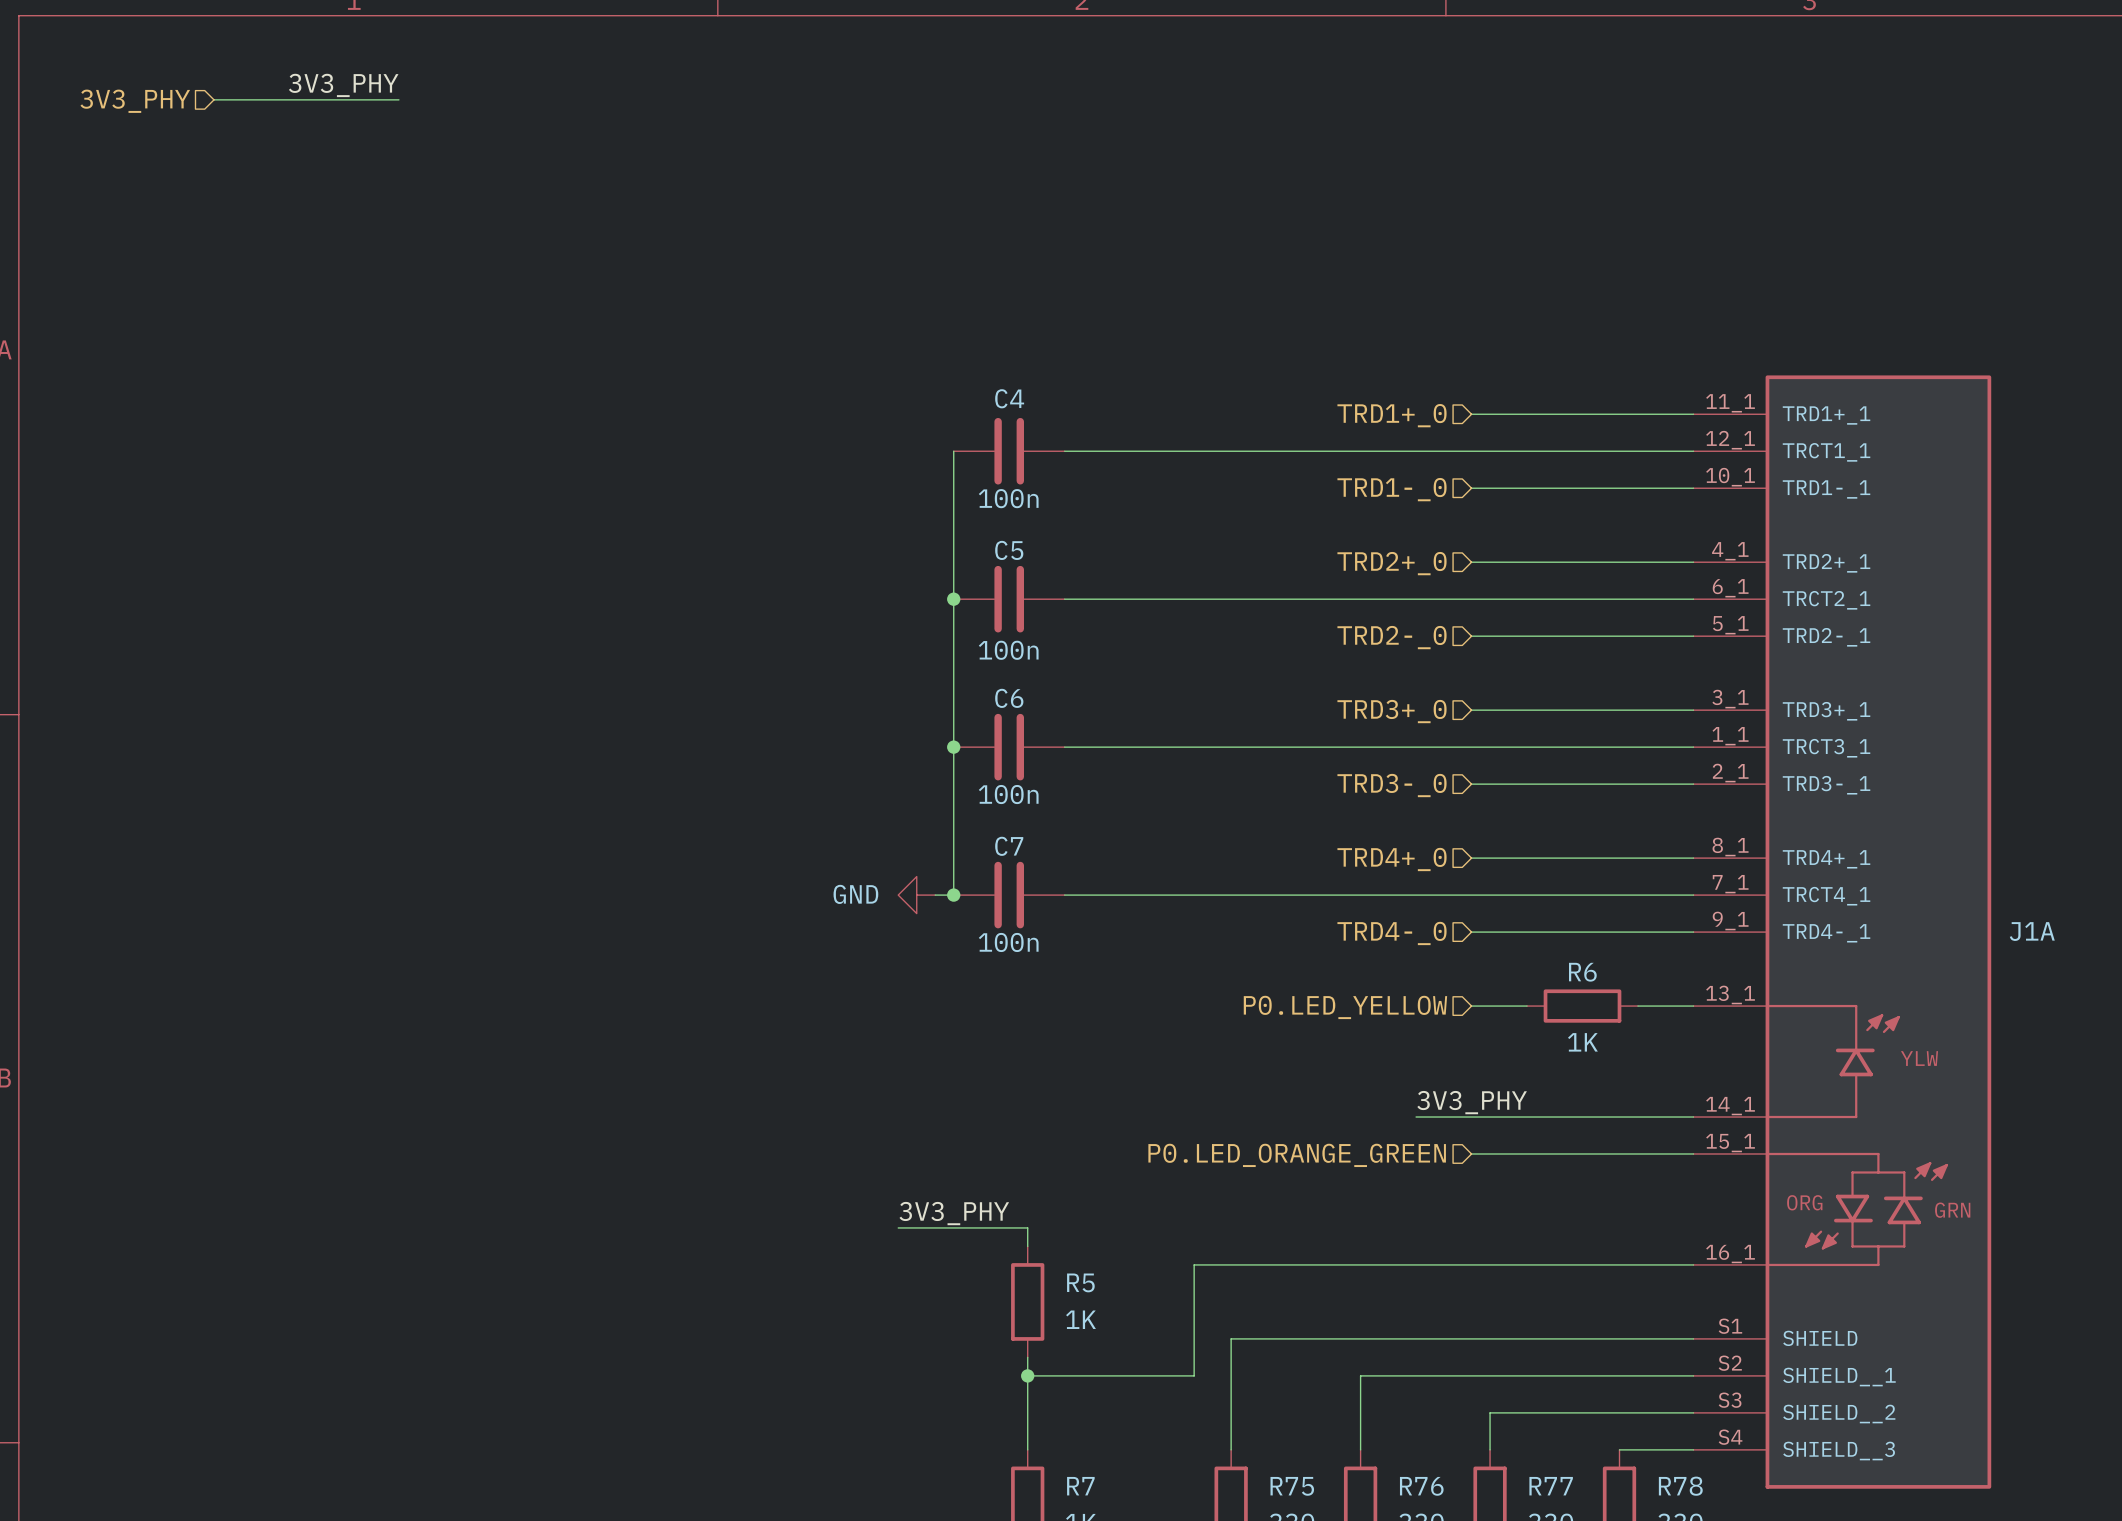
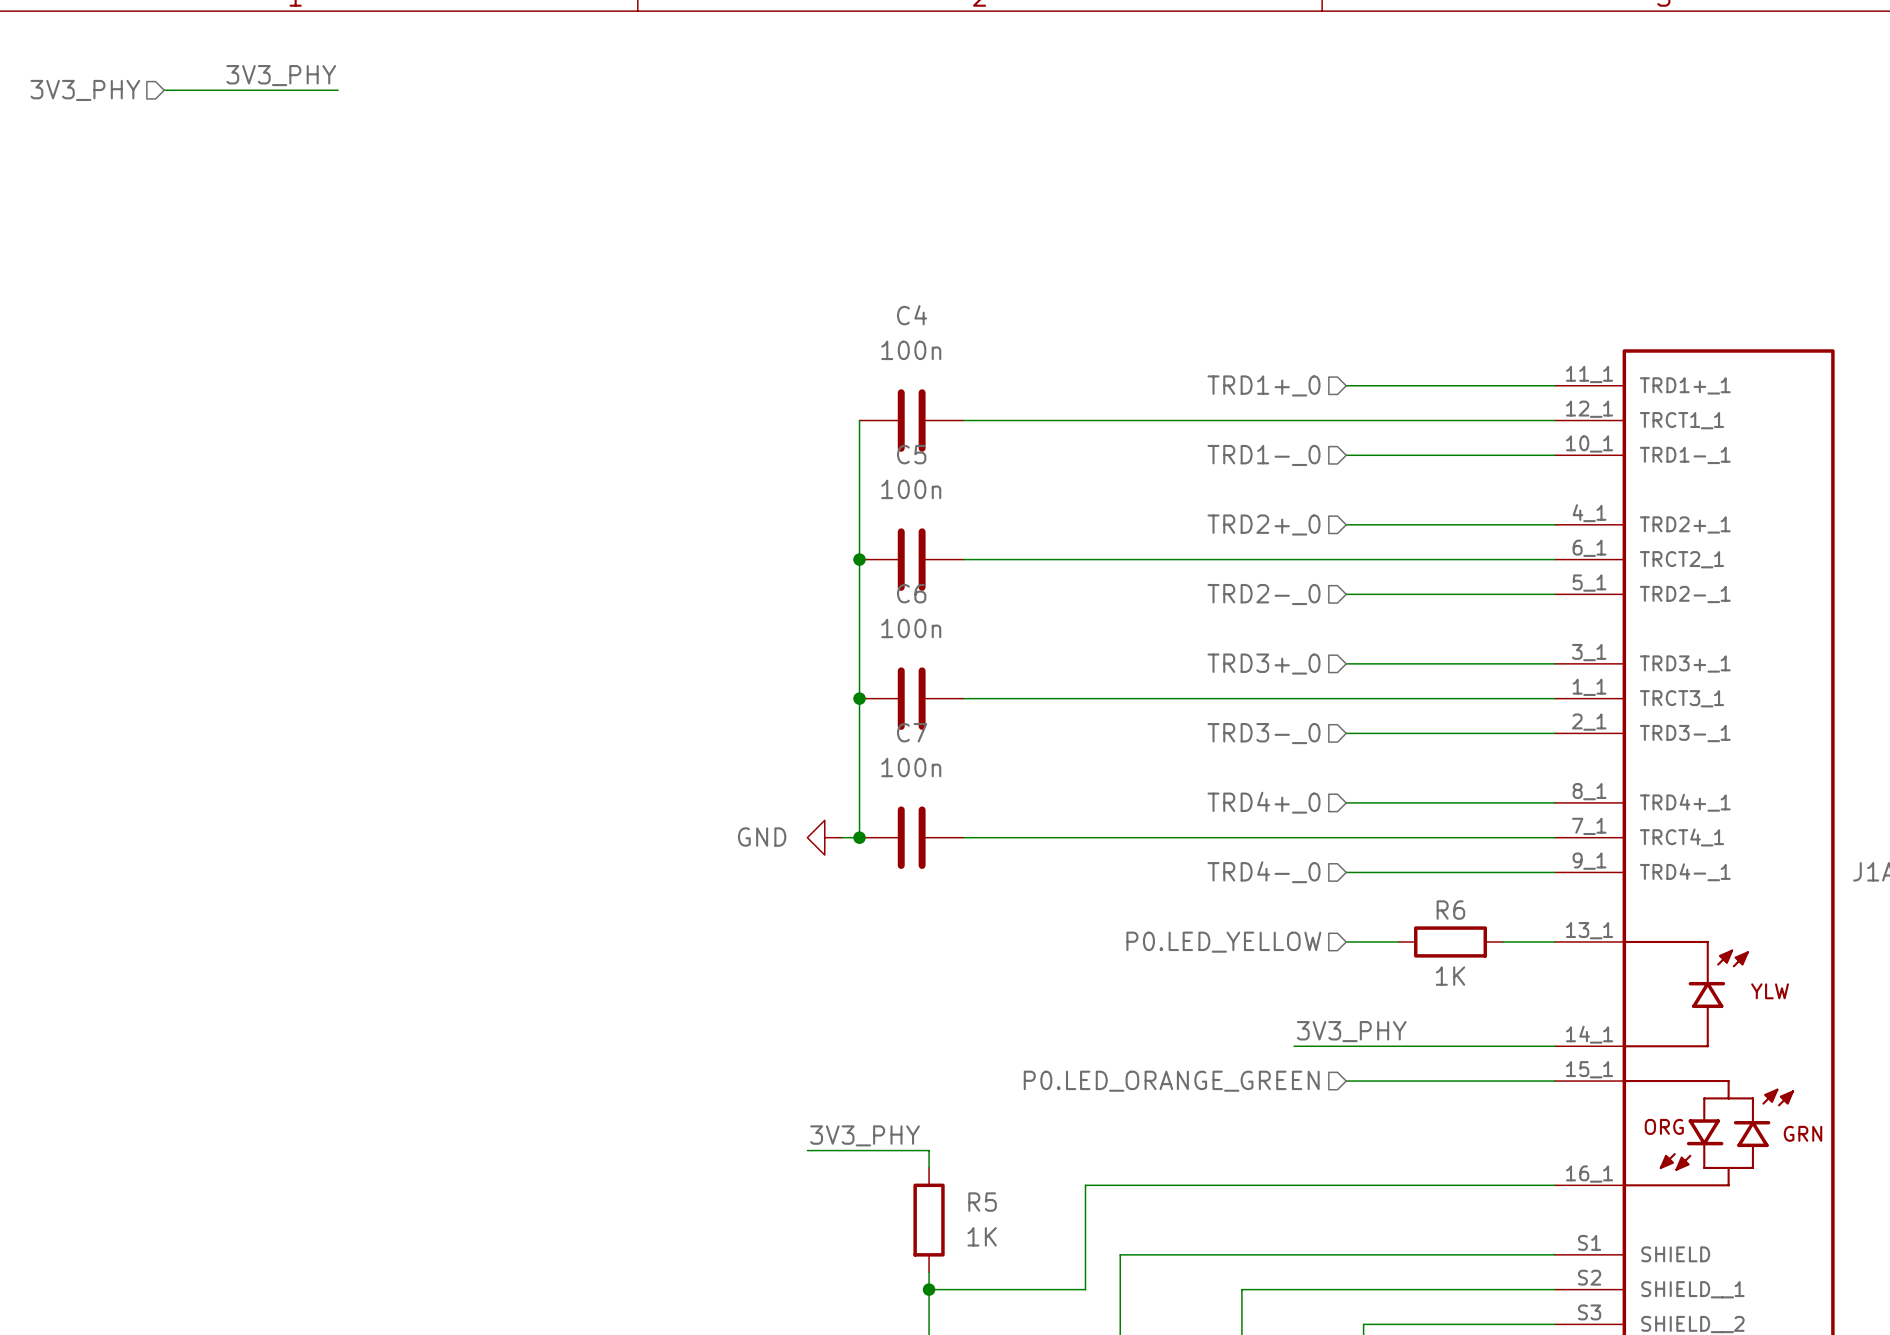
C4 name position: C4 (1009, 398) -> C4 (912, 315)
C4 value position: 100n (1008, 498) -> 100n (911, 350)
C5 name position: C5 (1009, 550) -> C5 (911, 454)
C5 value position: 100n (1008, 650) -> 100n (911, 489)
C6 name position: C6 (1009, 698) -> C6 (911, 593)
C6 value position: 100n (1008, 794) -> 100n (911, 628)
C7 name position: C7 (1009, 846) -> C7 (912, 732)
C7 value position: 100n (1008, 942) -> 100n (911, 767)

